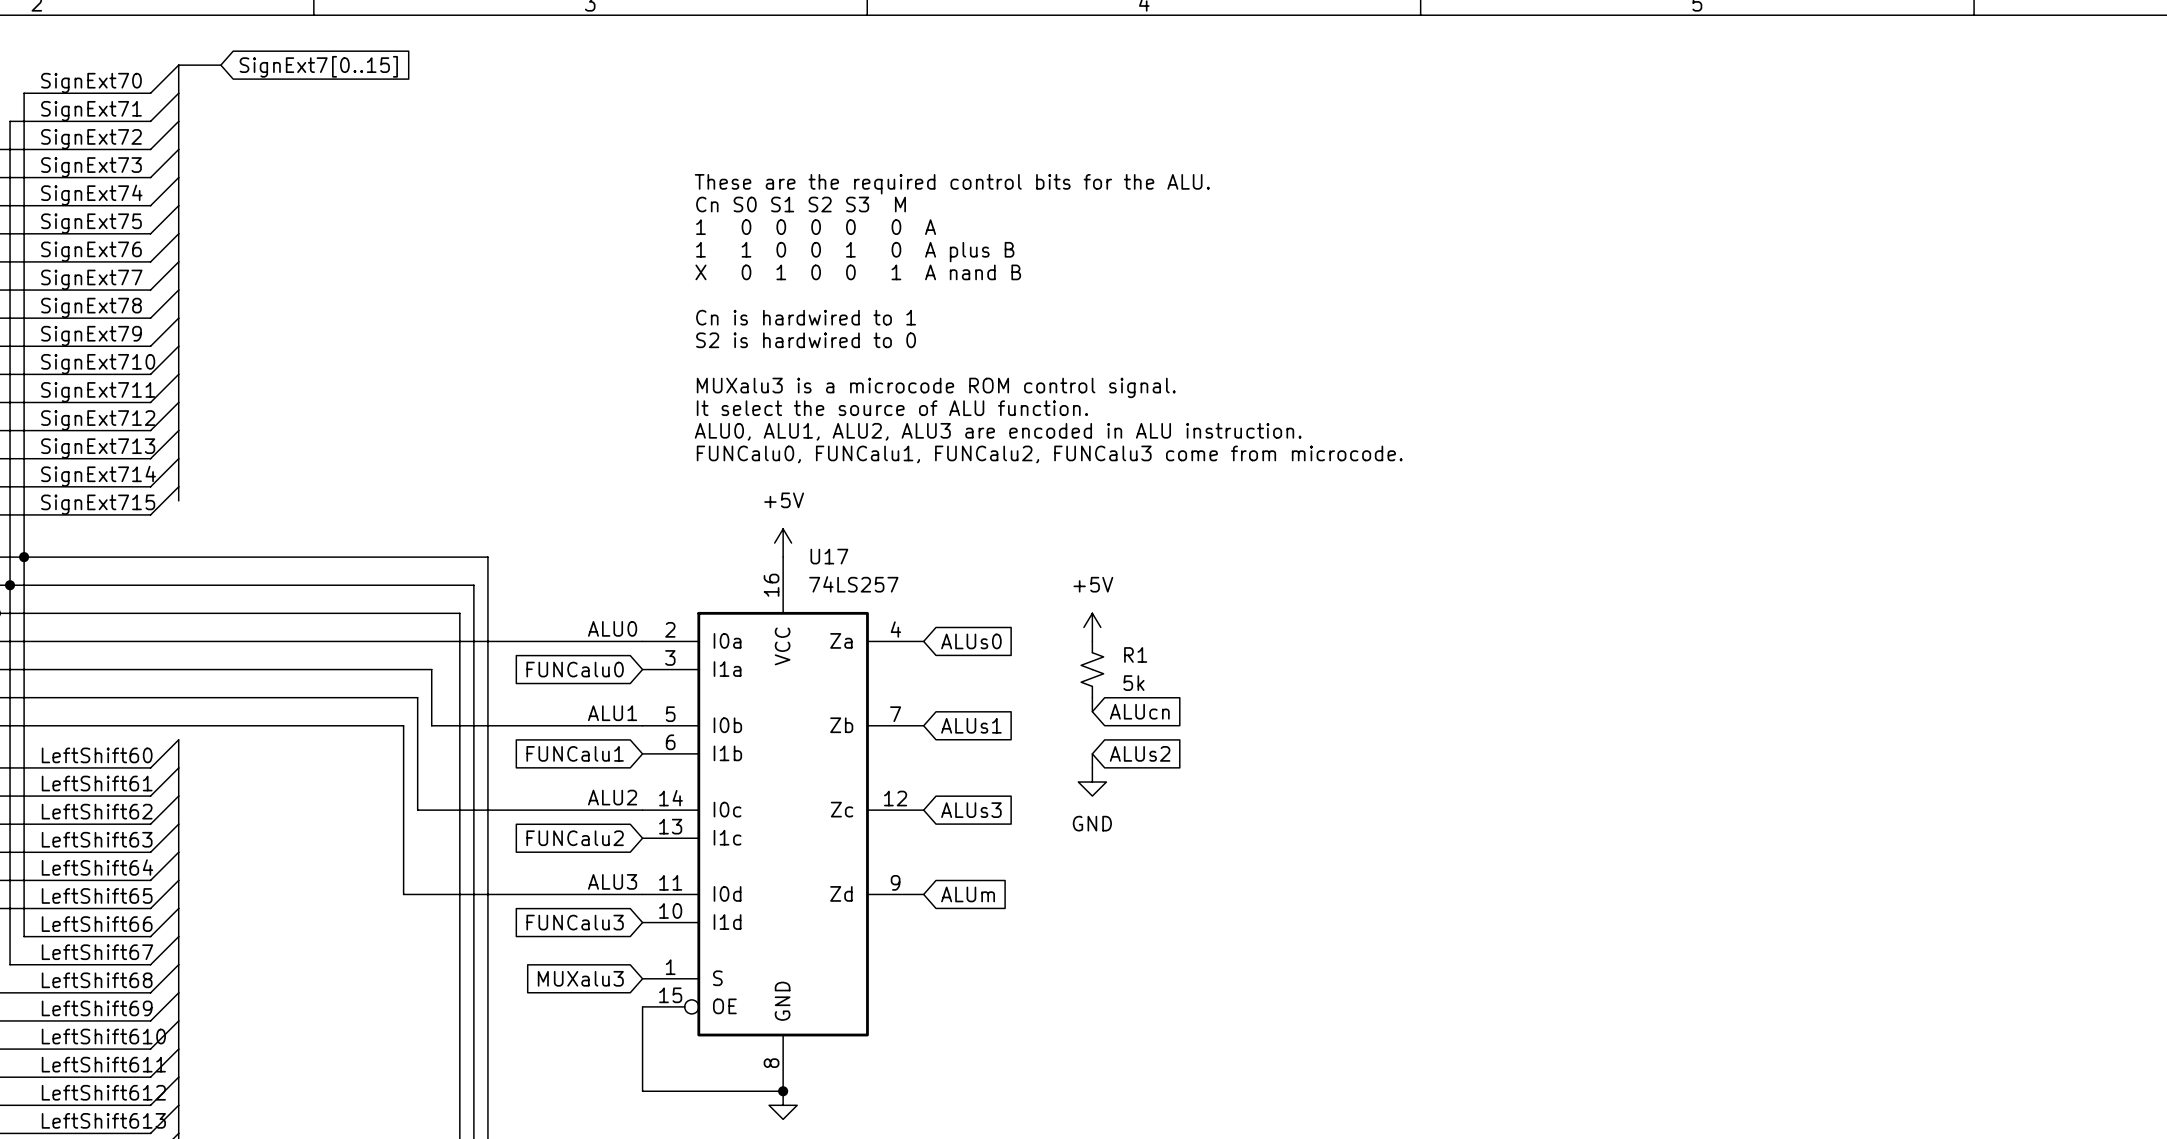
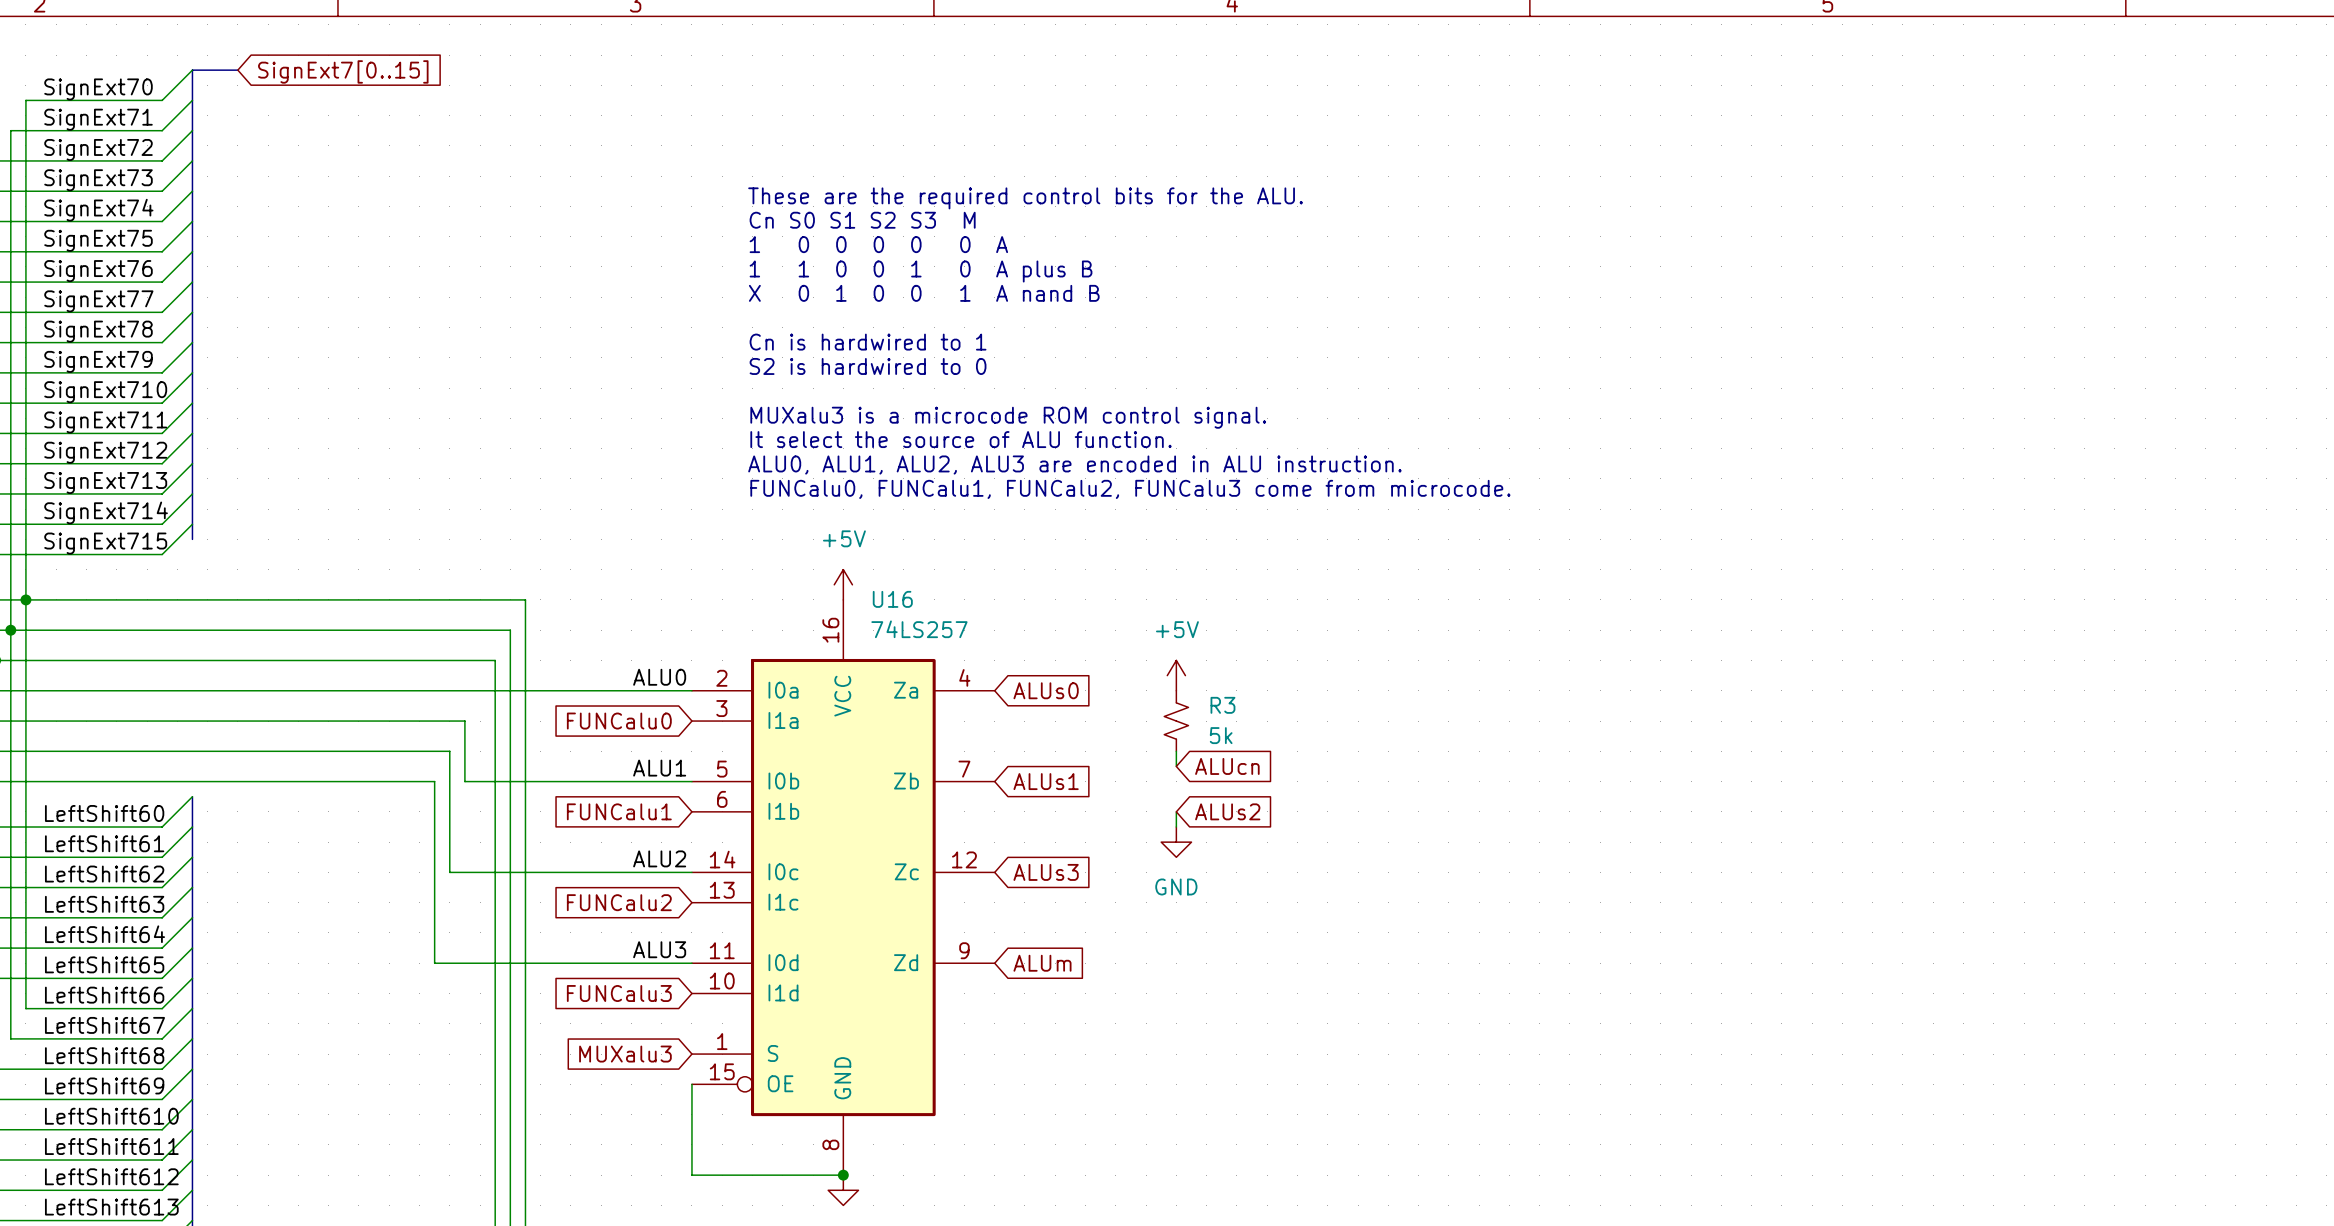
U17 name: U17 (829, 556) -> U16 (892, 599)
R1 name: R1 (1135, 654) -> R3 (1222, 705)

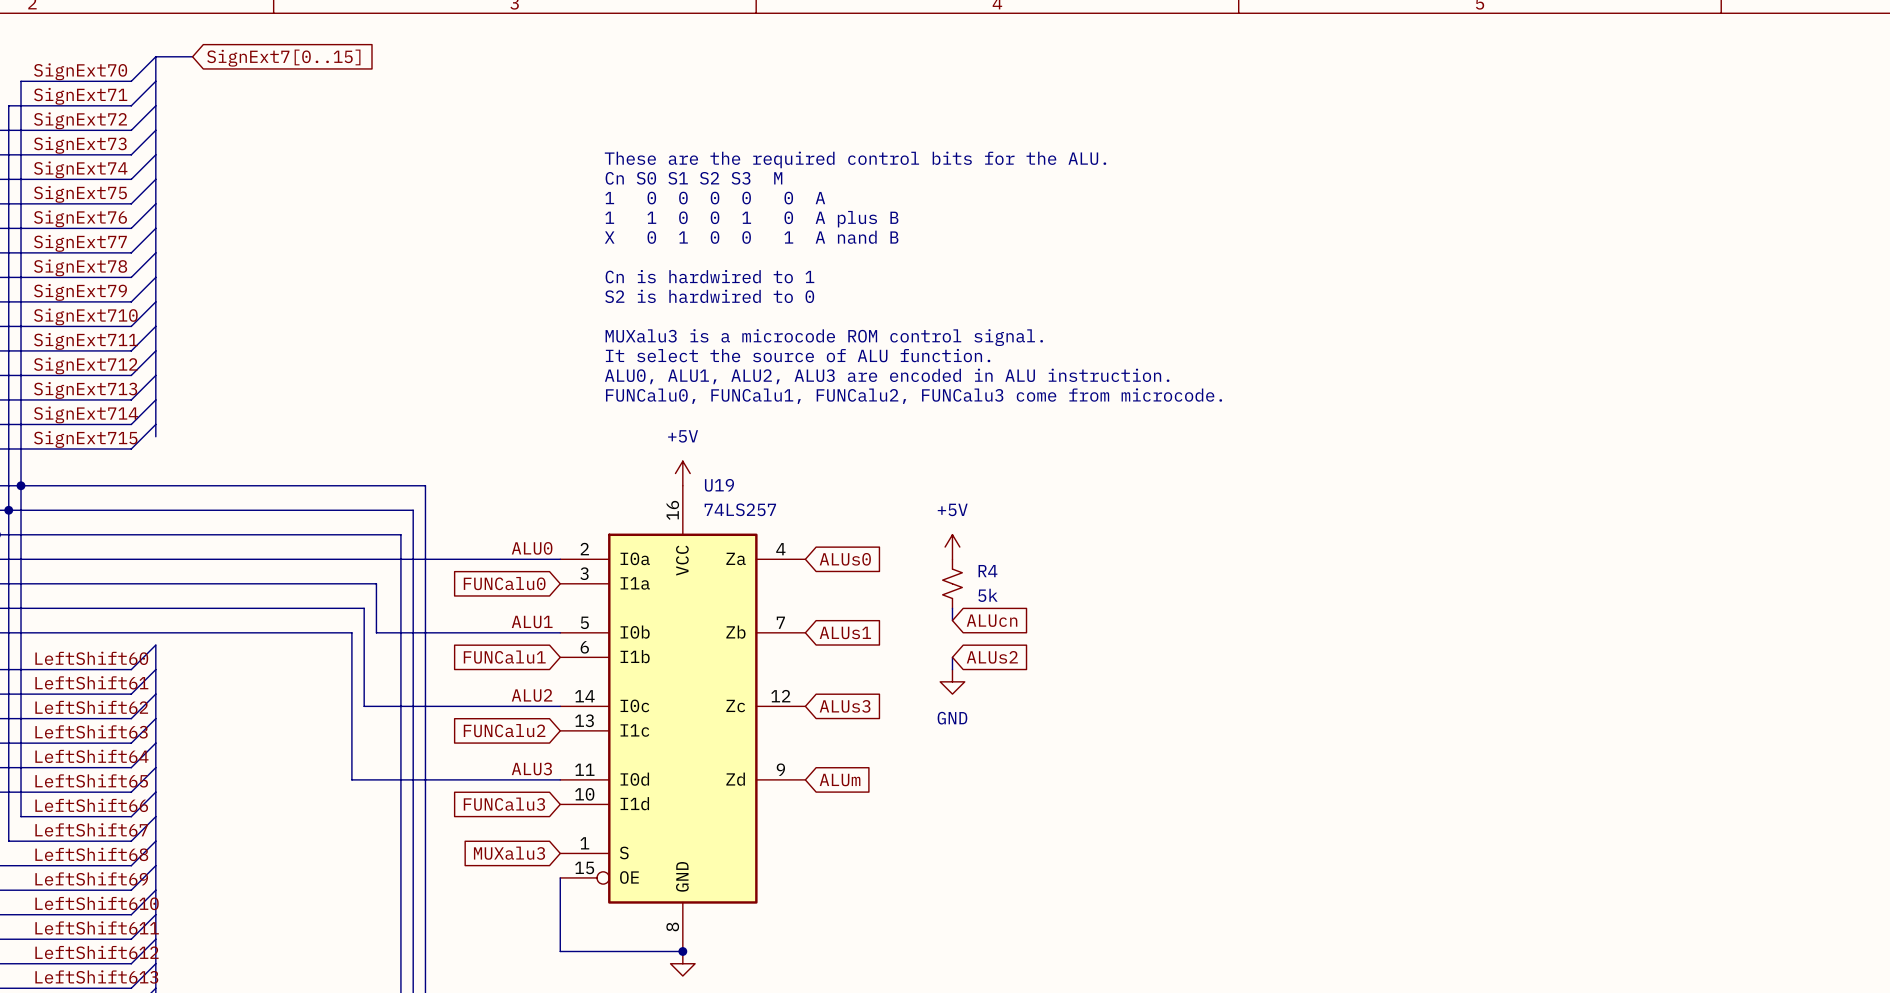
U16 name: U16 (892, 599) -> U19 (719, 485)
R3 name: R3 (1222, 705) -> R4 (987, 571)

